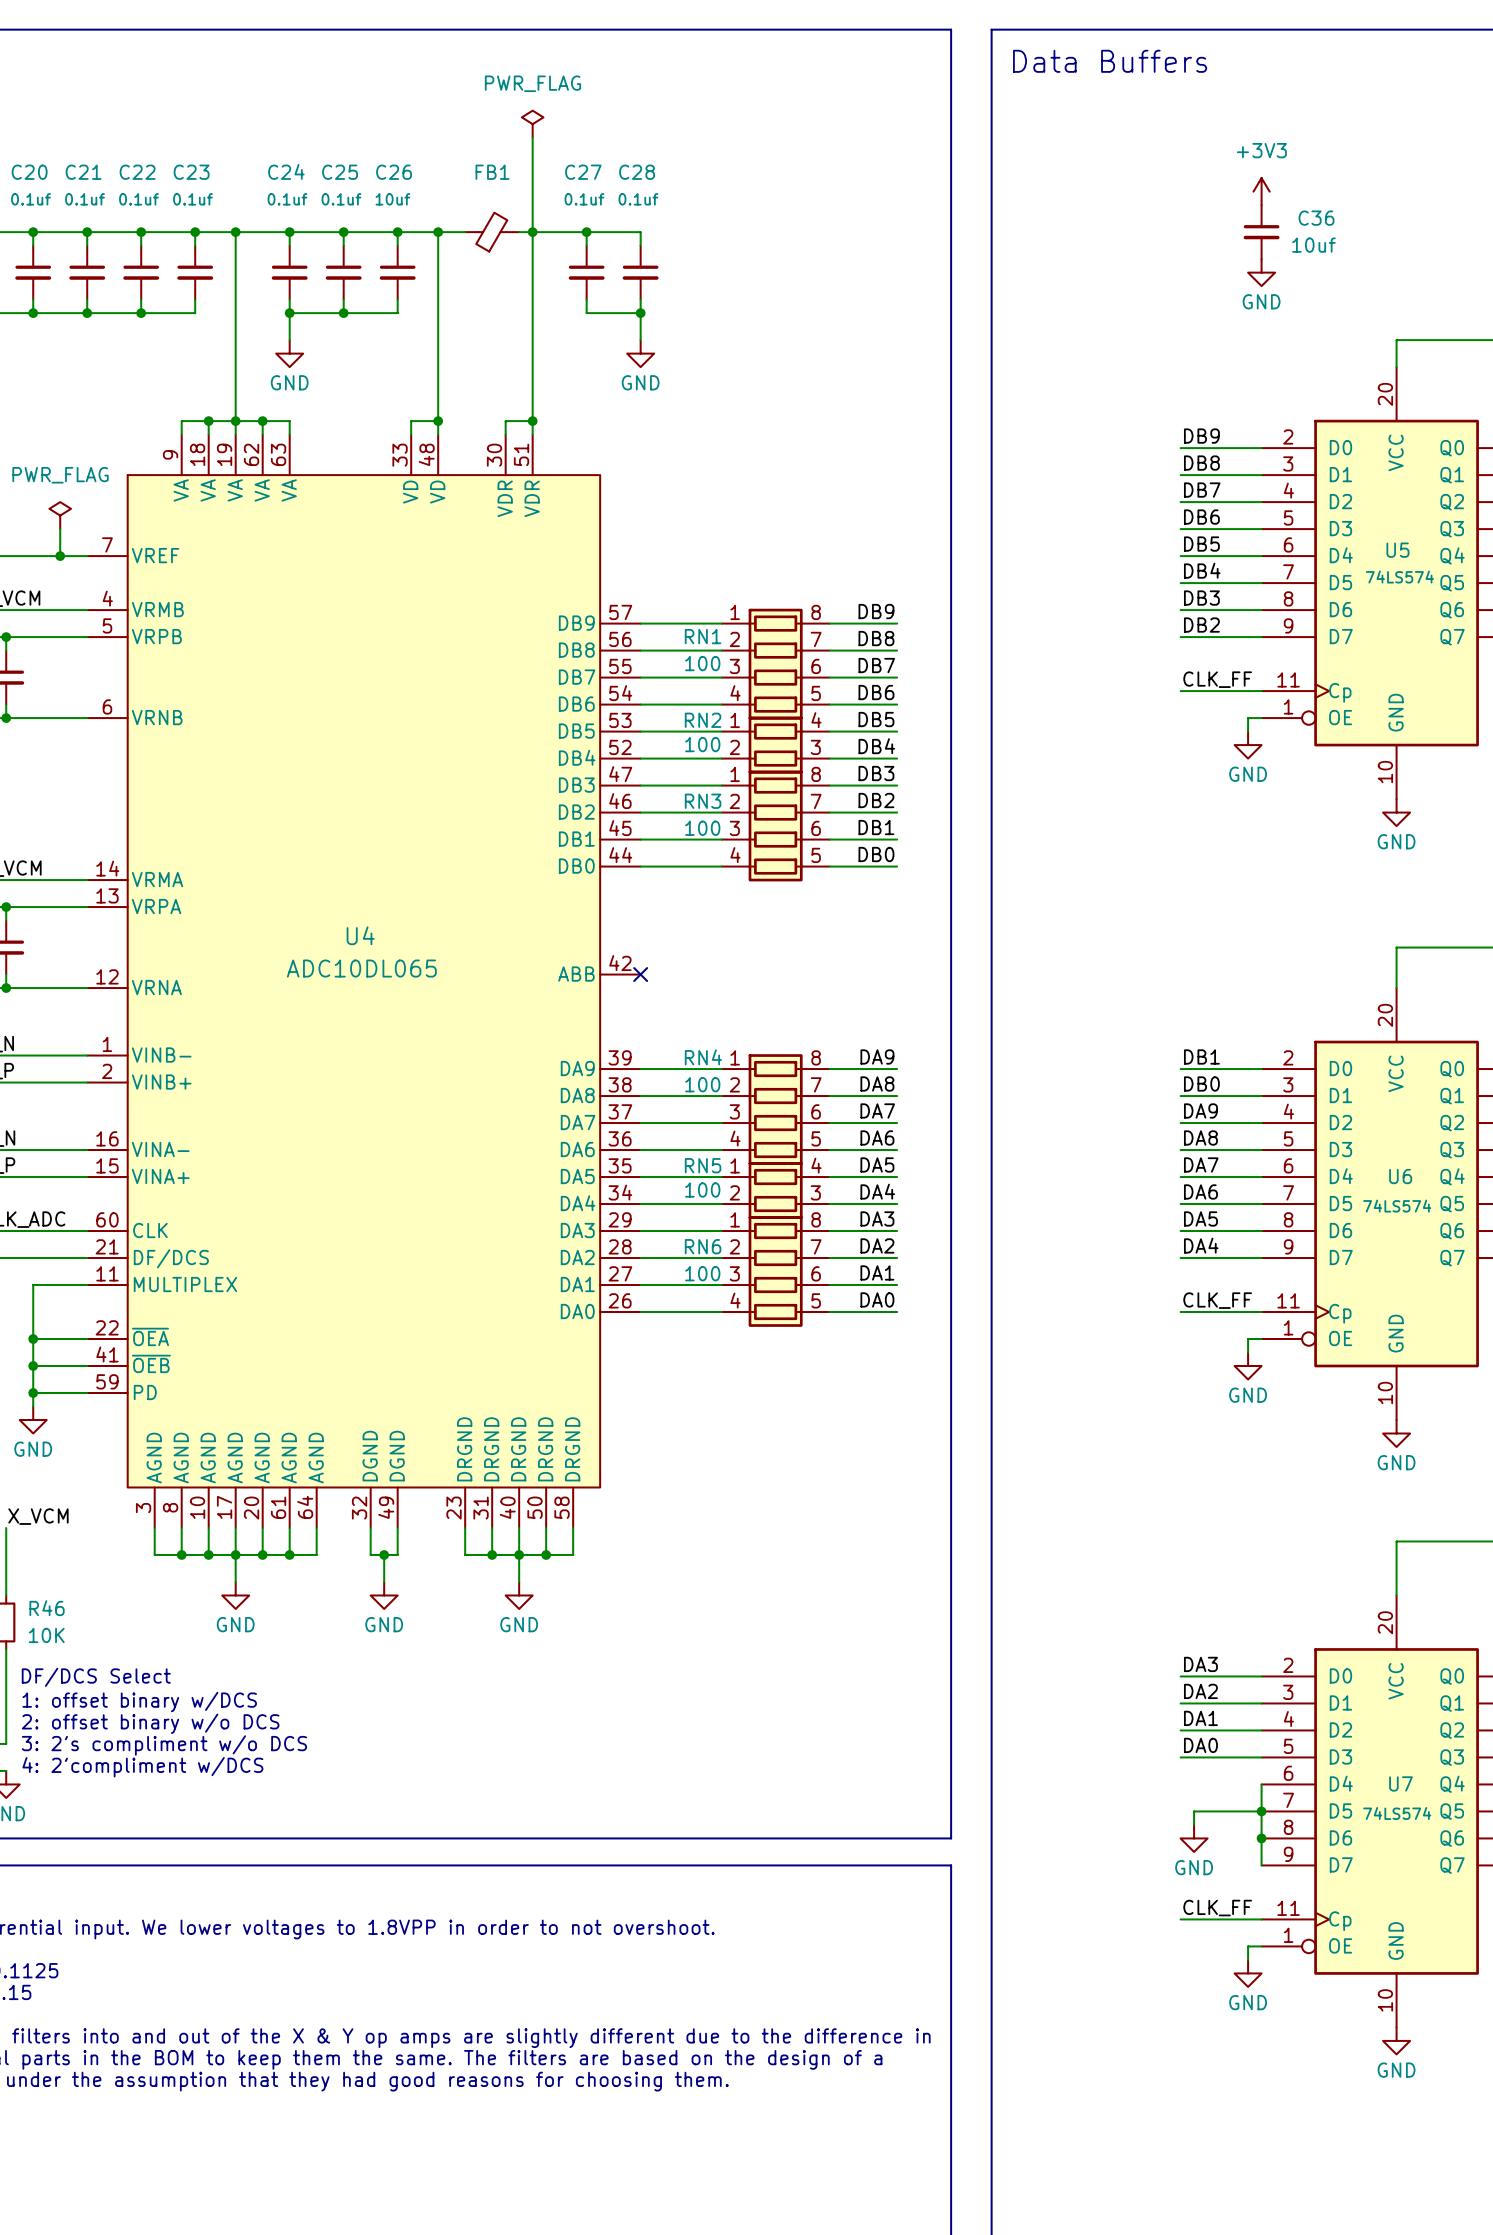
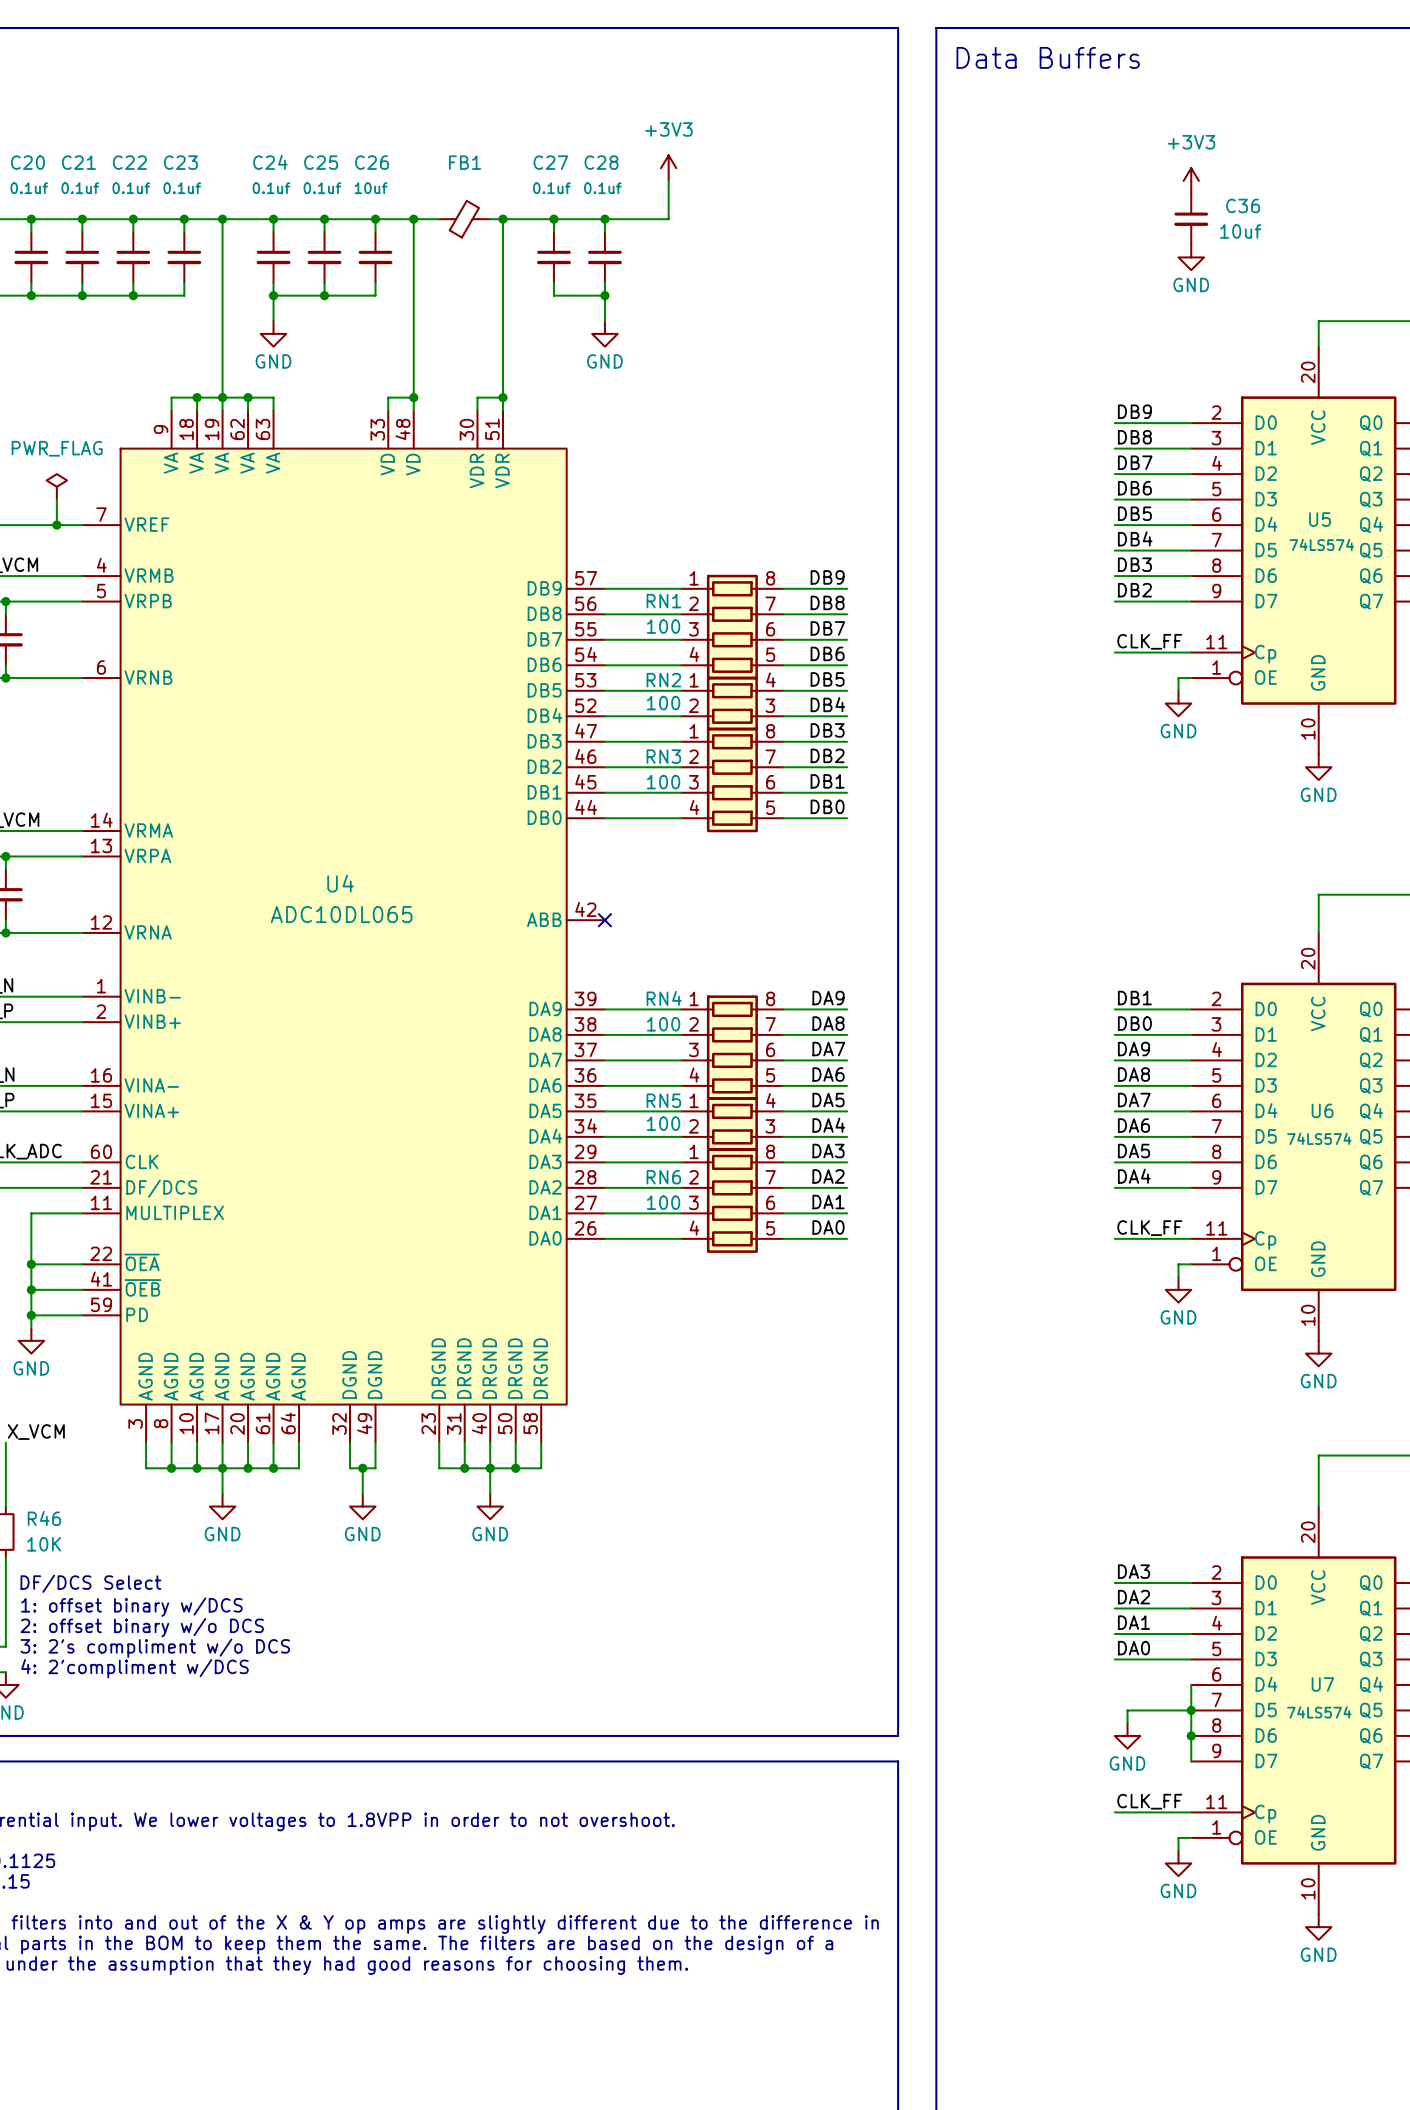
power symbol: PWR_FLAG (532, 124) -> none
wire: (532, 137) (532, 232) -> none
power symbol: none -> +3V3 (668, 168)
wire: none -> (668, 180) (668, 219) (604, 219)
junction: none -> (604, 219)

